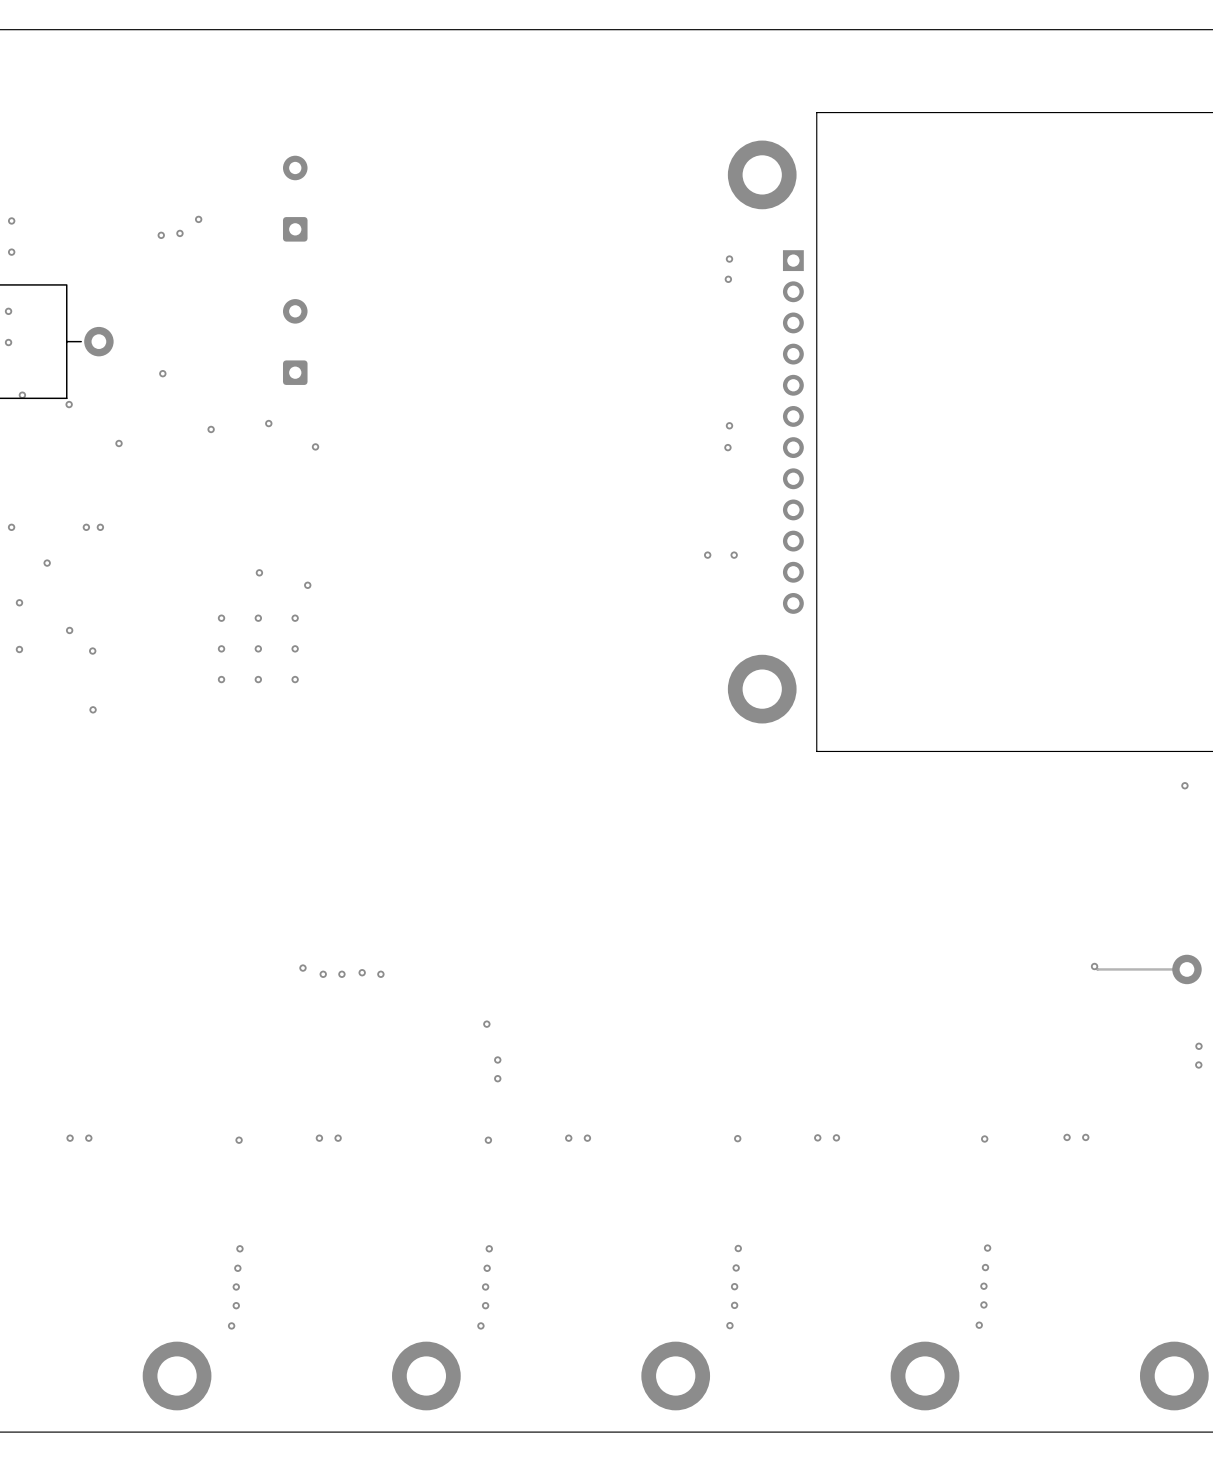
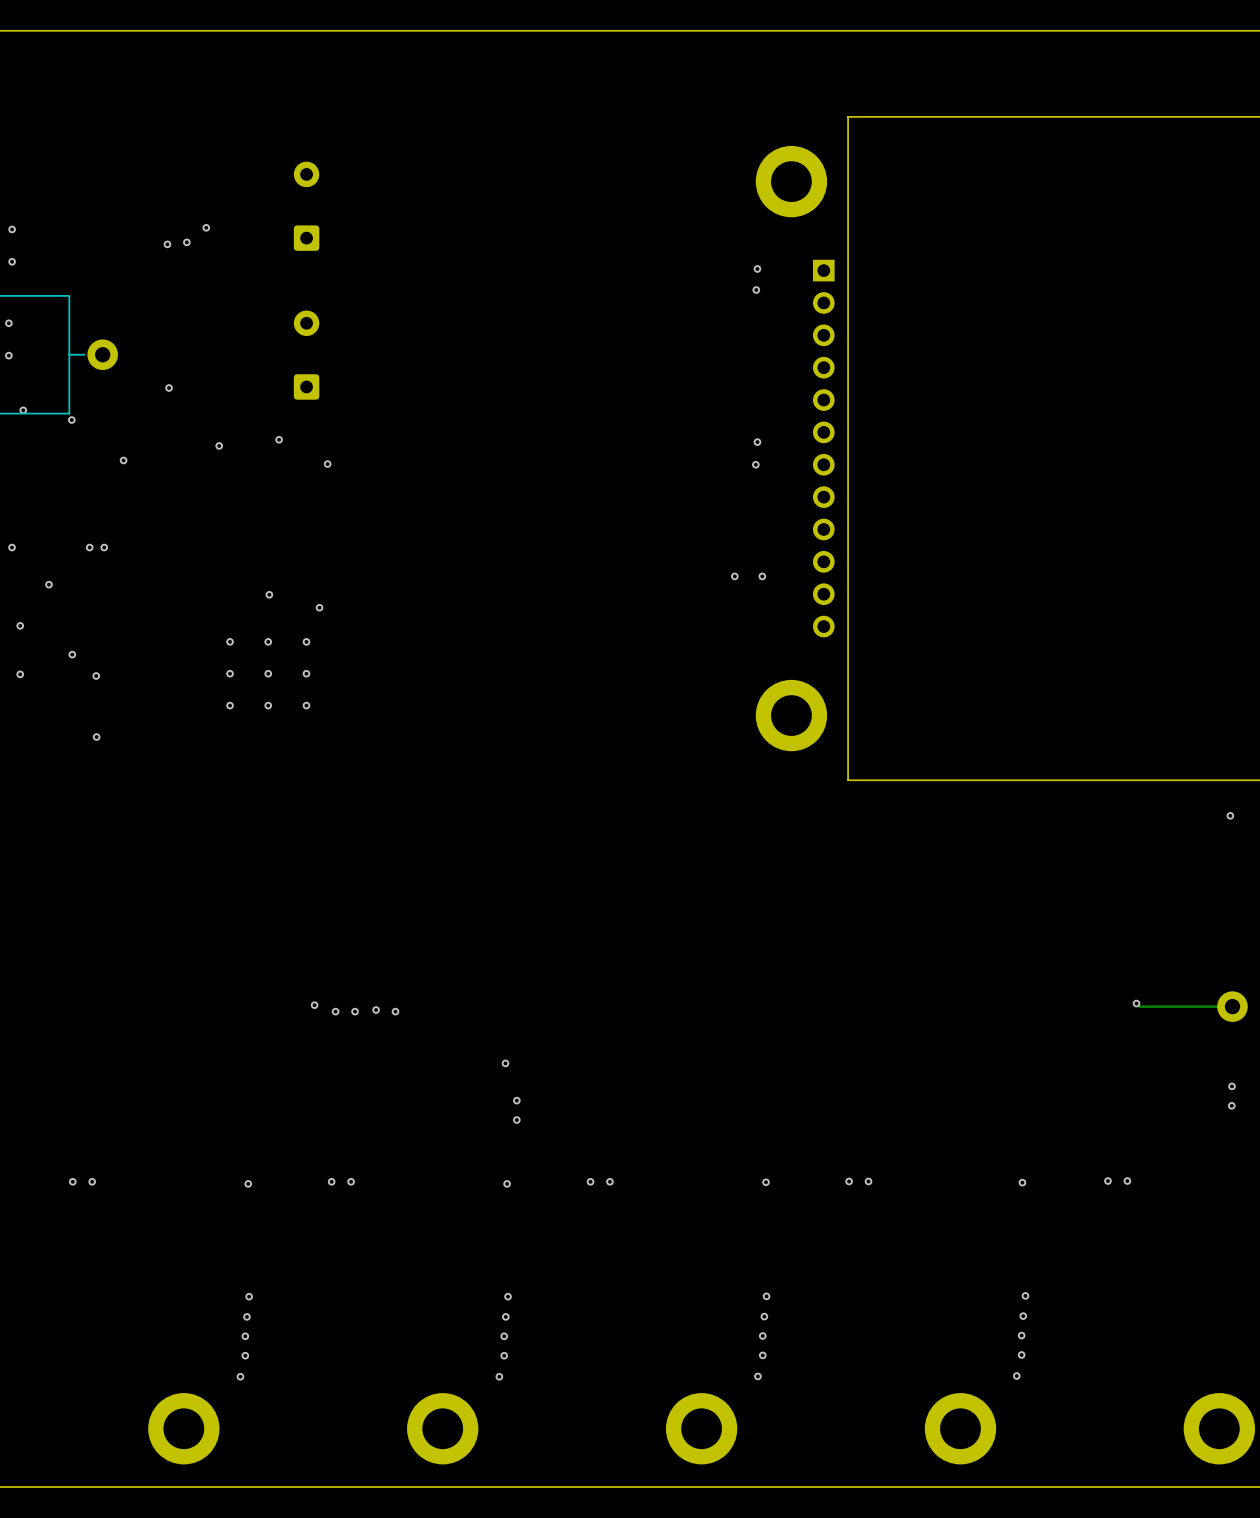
via: none -> (1231, 1086)
via: (1198, 1046) -> none
via: none -> (1231, 1105)
via: (1198, 1064) -> none

